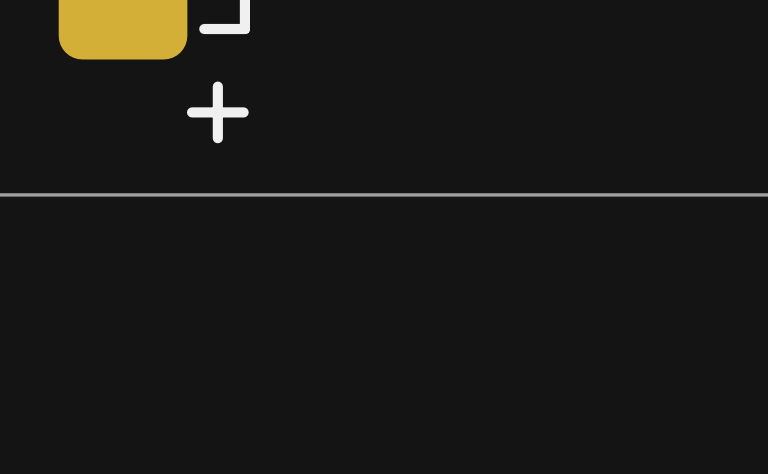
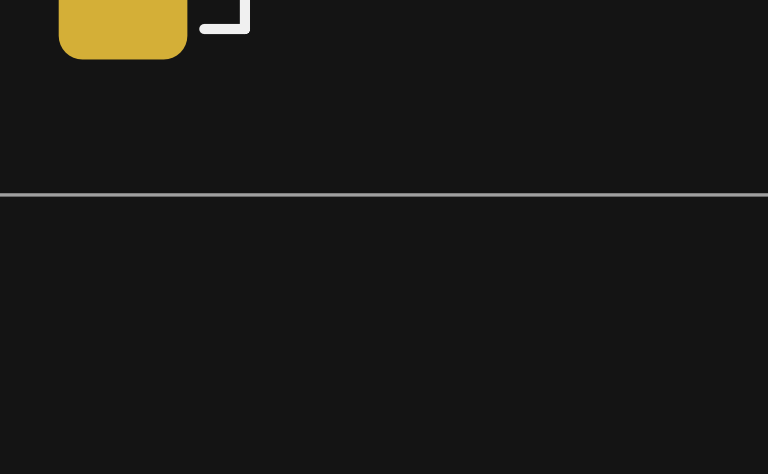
text: + (217, 112) -> none

